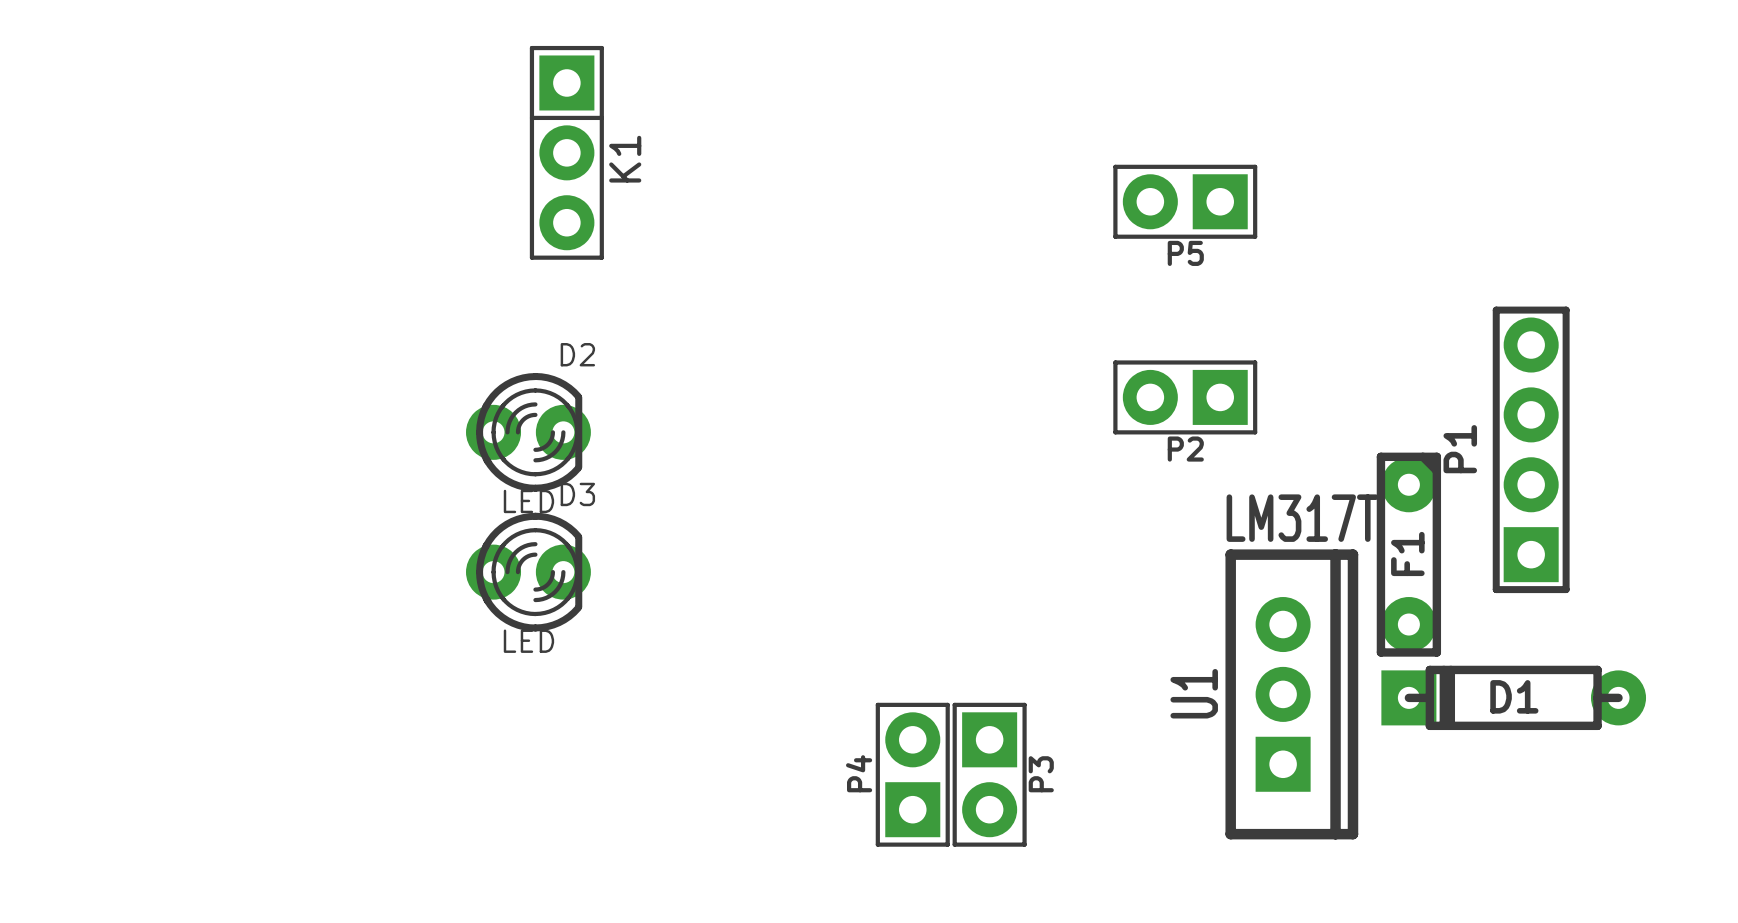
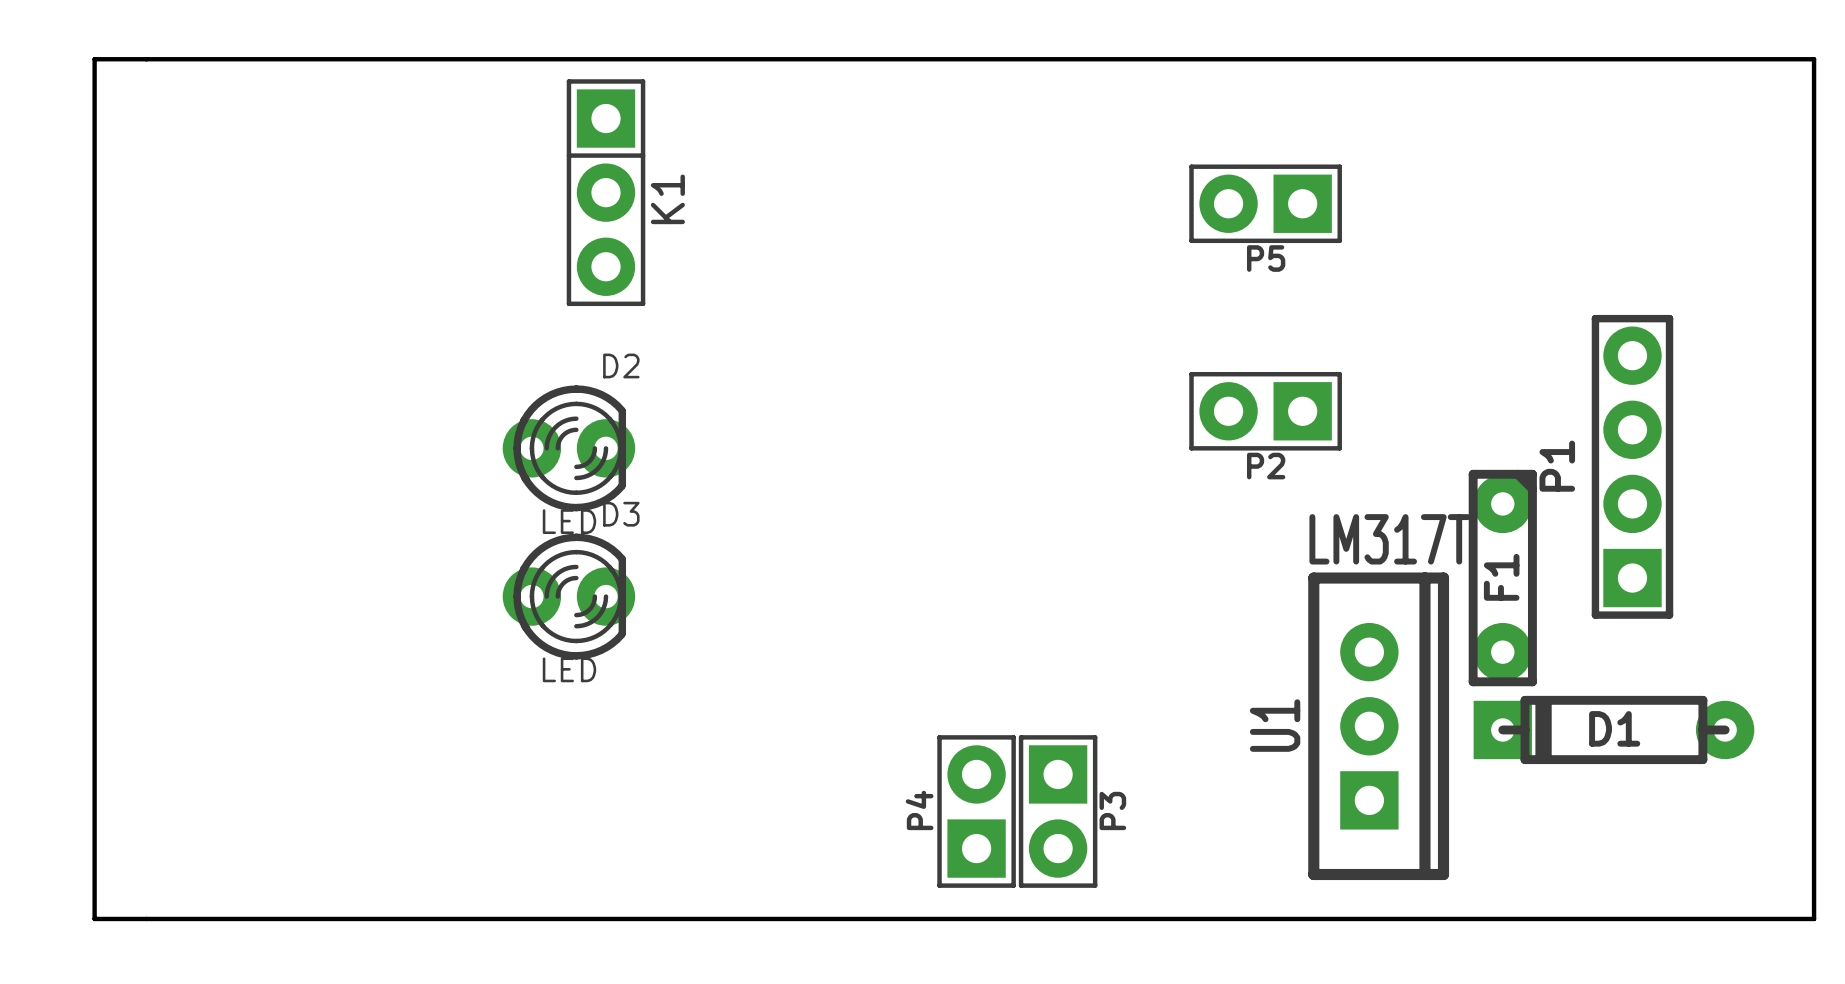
board edge: none -> (94, 59) (94, 918) (1814, 918) (1814, 59) (94, 59)
K1 position: (566, 152) -> (606, 192)

